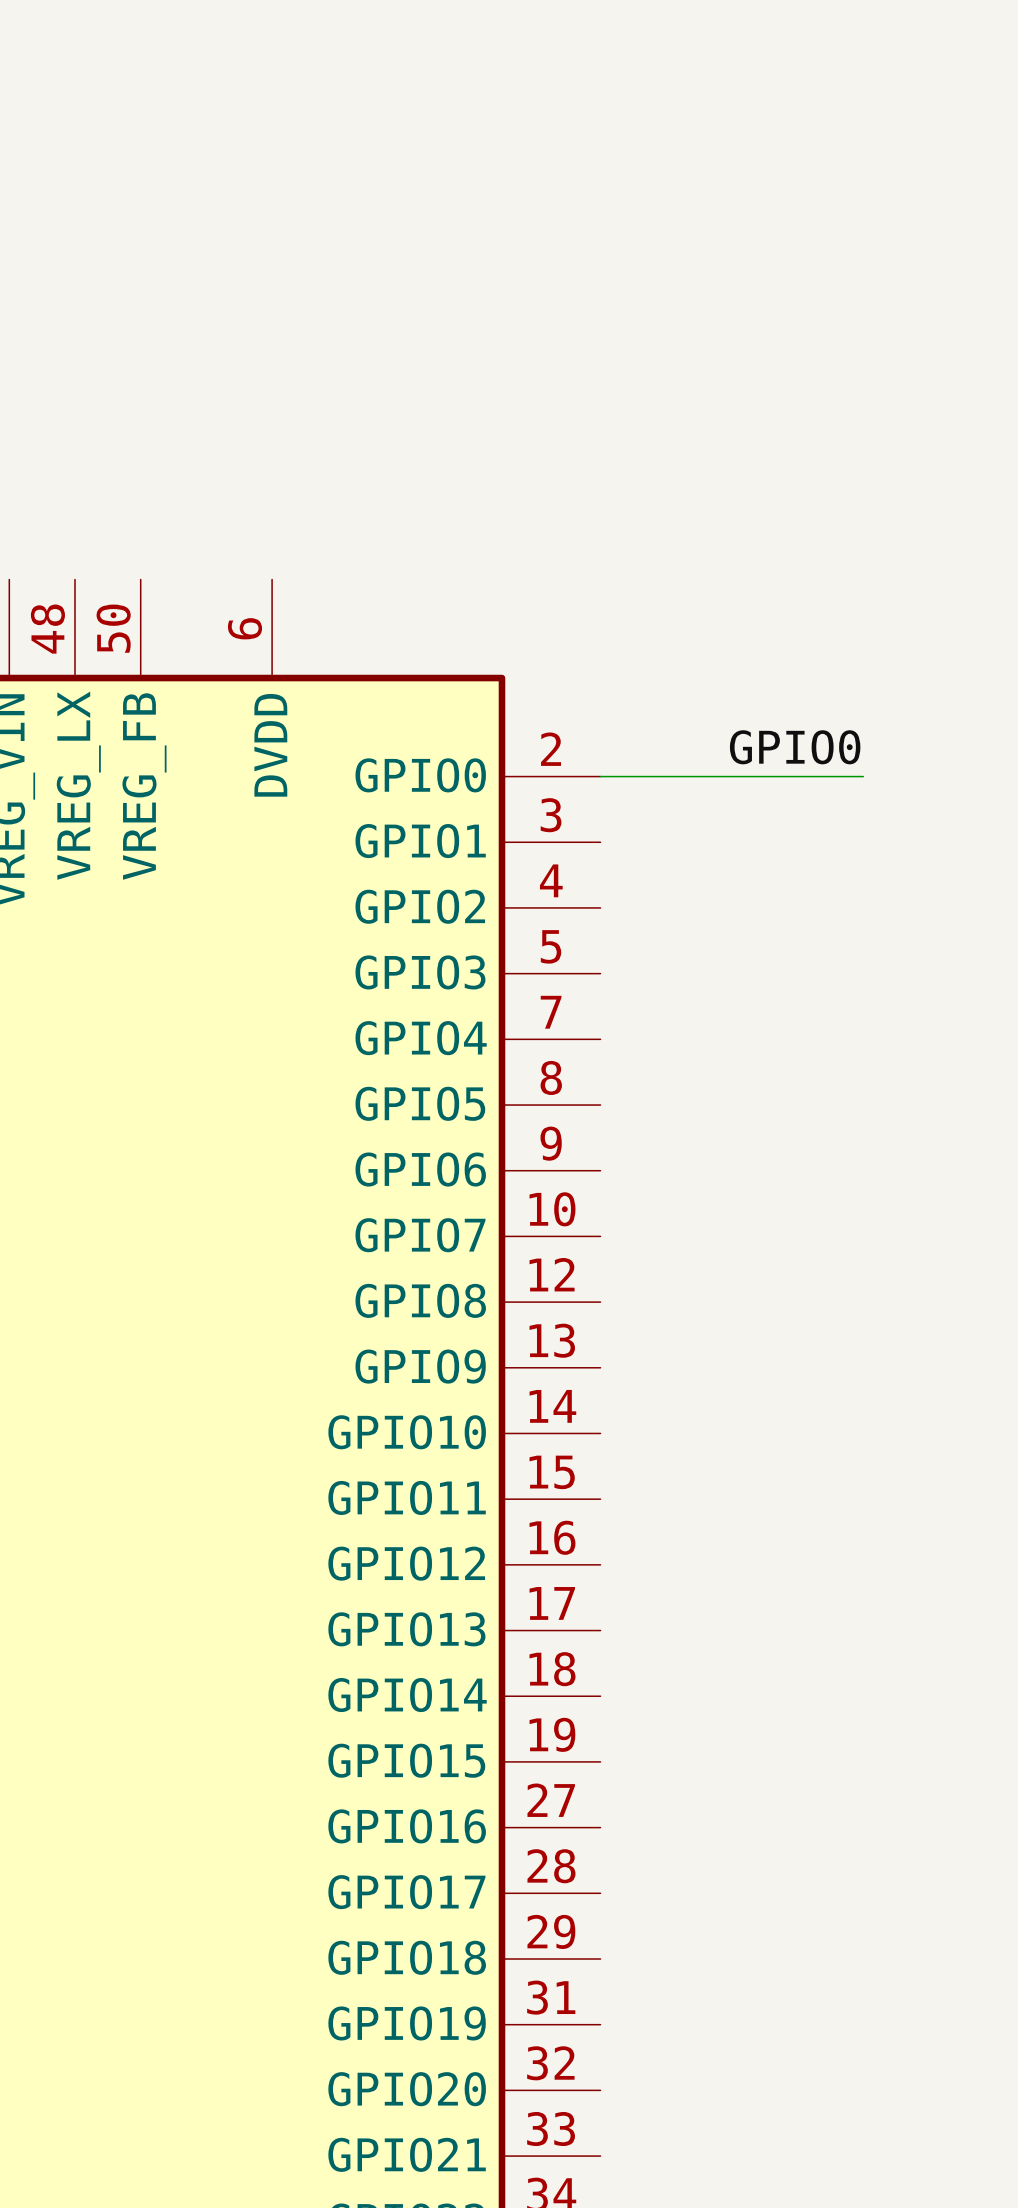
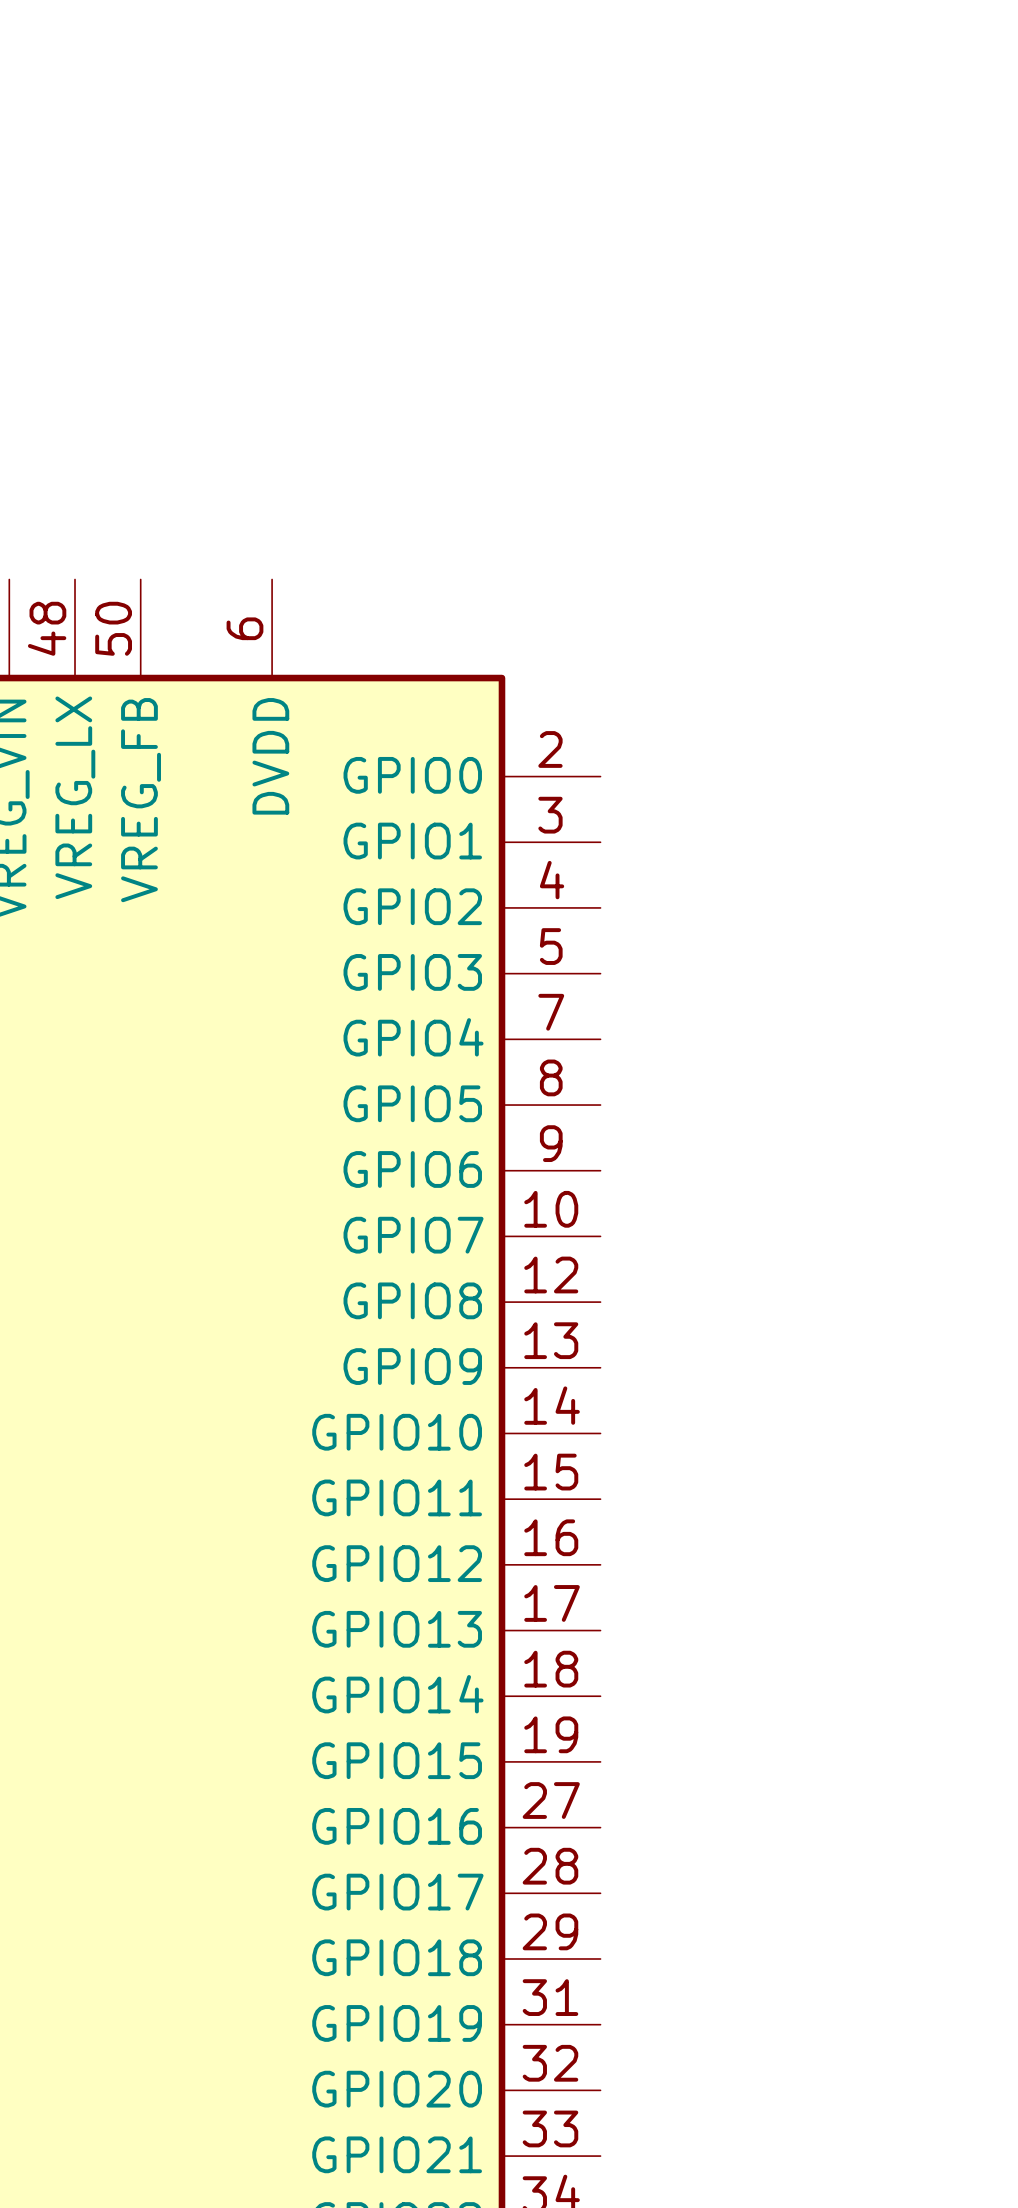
label: GPIO0 (795, 747) -> none
wire: (600, 776) (863, 776) -> none

